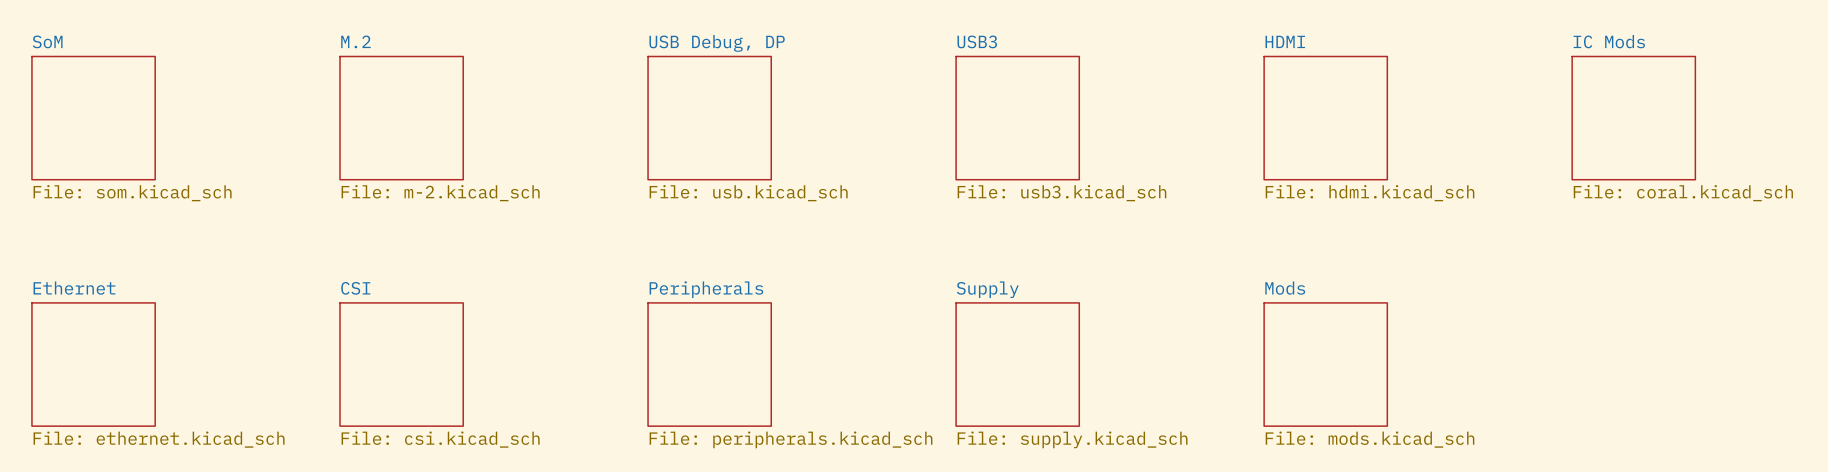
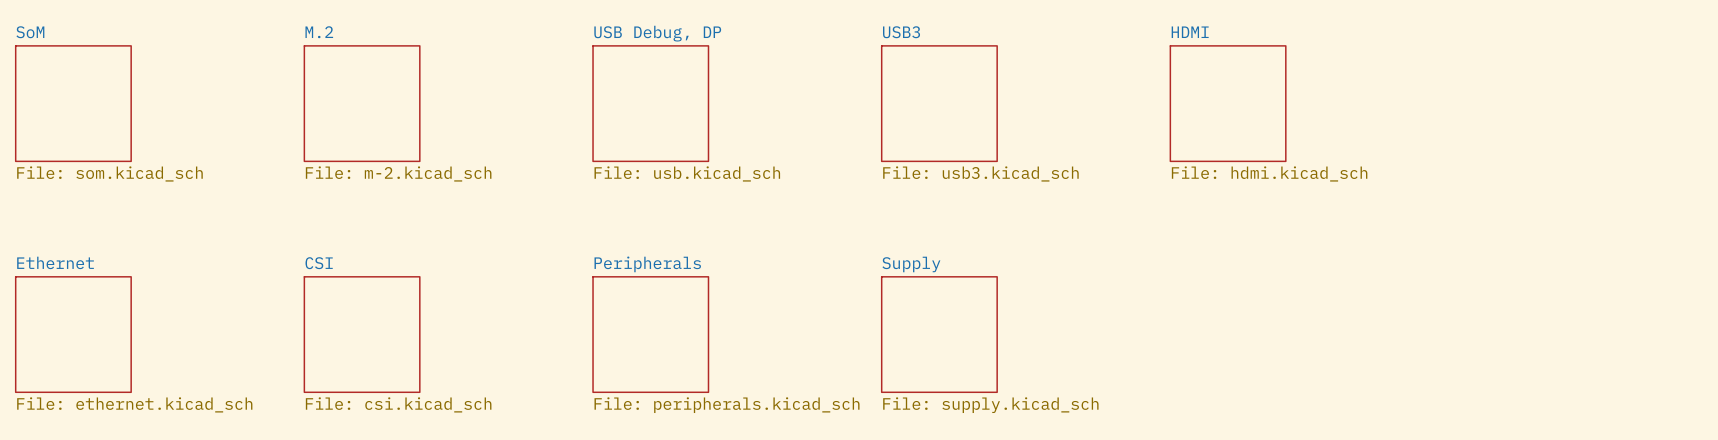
sheet IC Mods: File: coral.kicad_sch (1633, 118) -> none
sheet Mods: File: mods.kicad_sch (1325, 364) -> none

